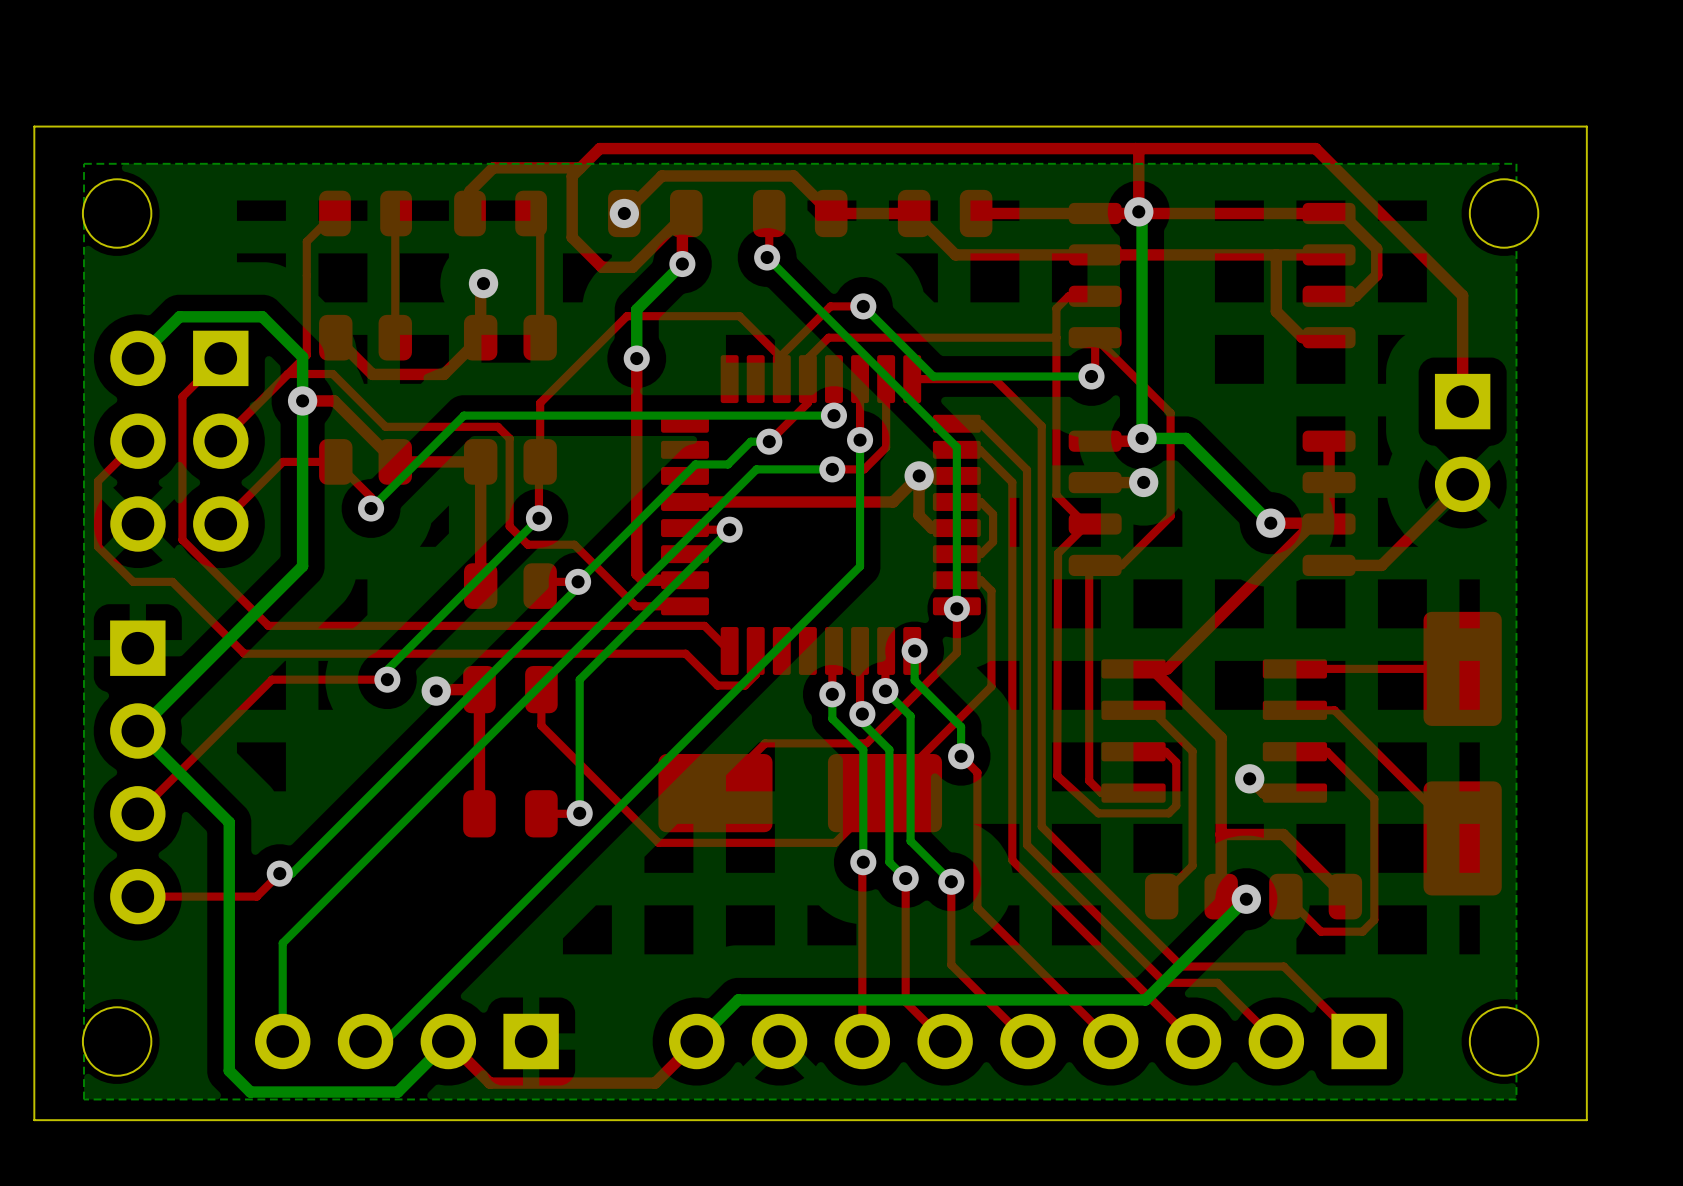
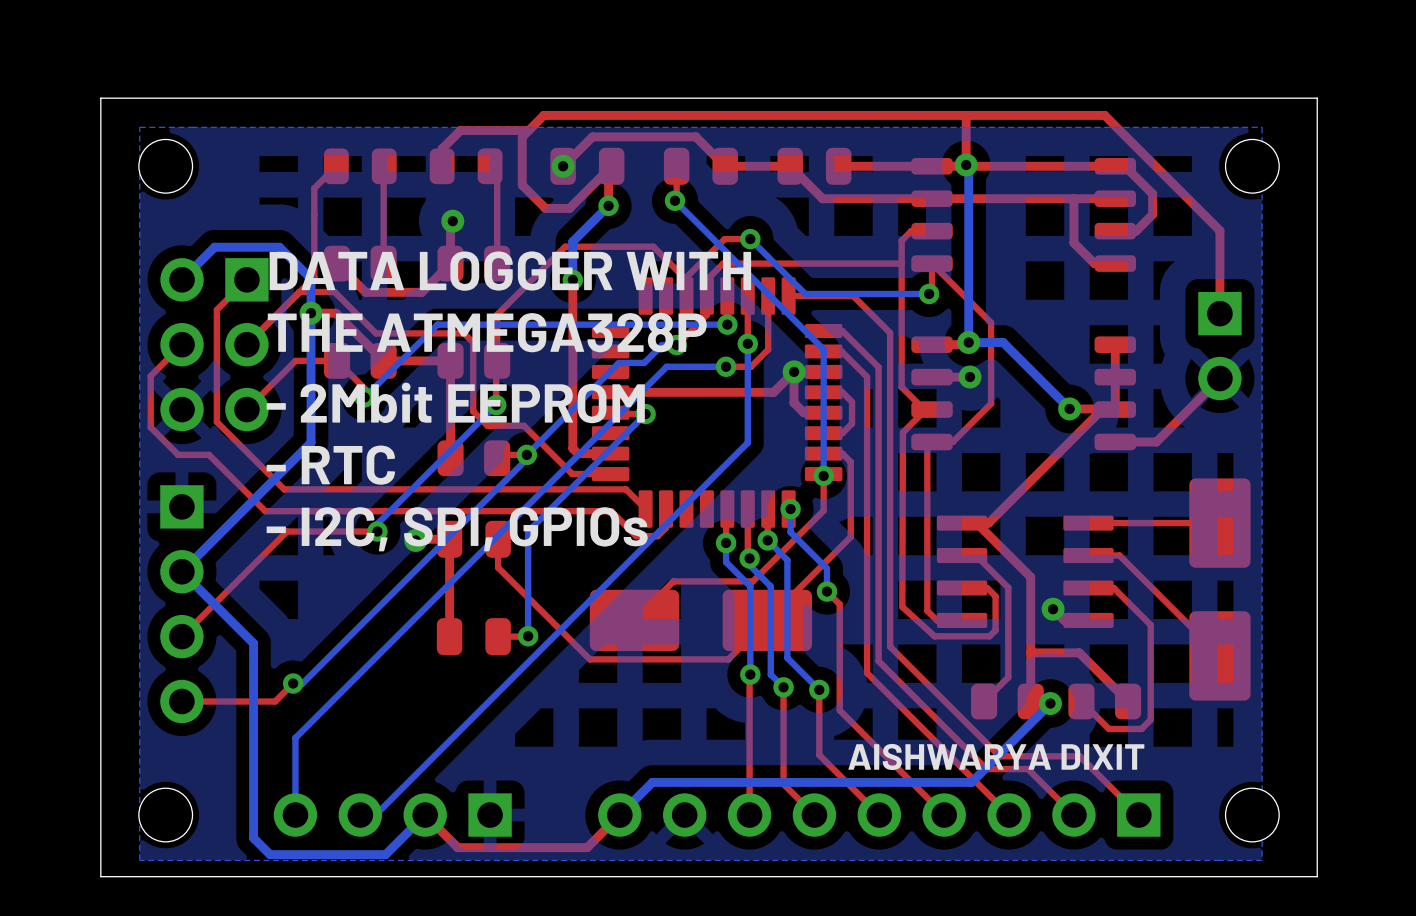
text: none -> DATA LOGGER WITH (510, 271)
text: none -> THE ATMEGA328P (487, 332)
text: none -> - 2Mbit EEPROM (455, 402)
text: none -> - RTC (330, 465)
text: none -> - I2C, SPI, GPIOs (457, 529)
text: none -> AISHWARYA DIXIT (996, 756)

